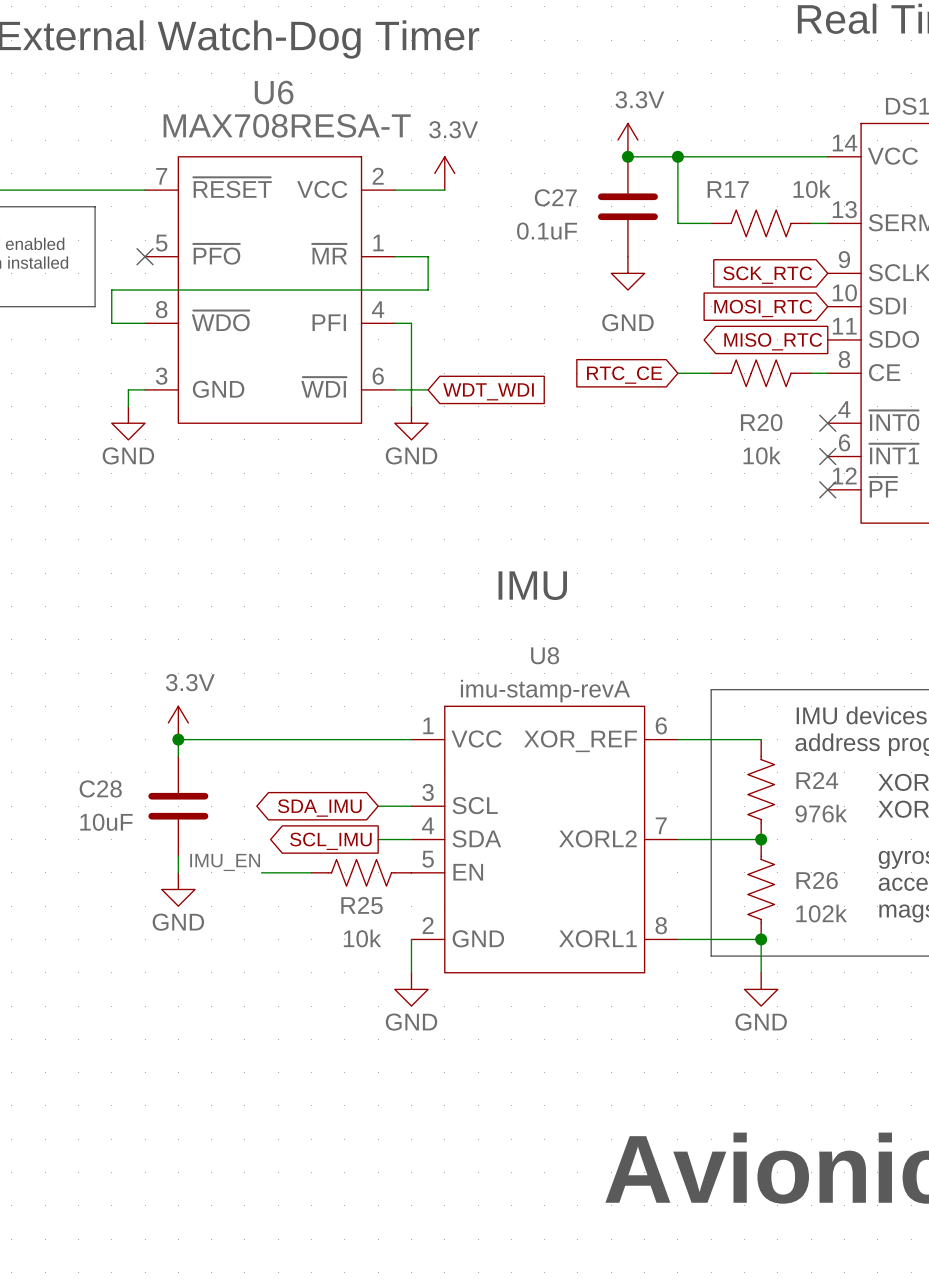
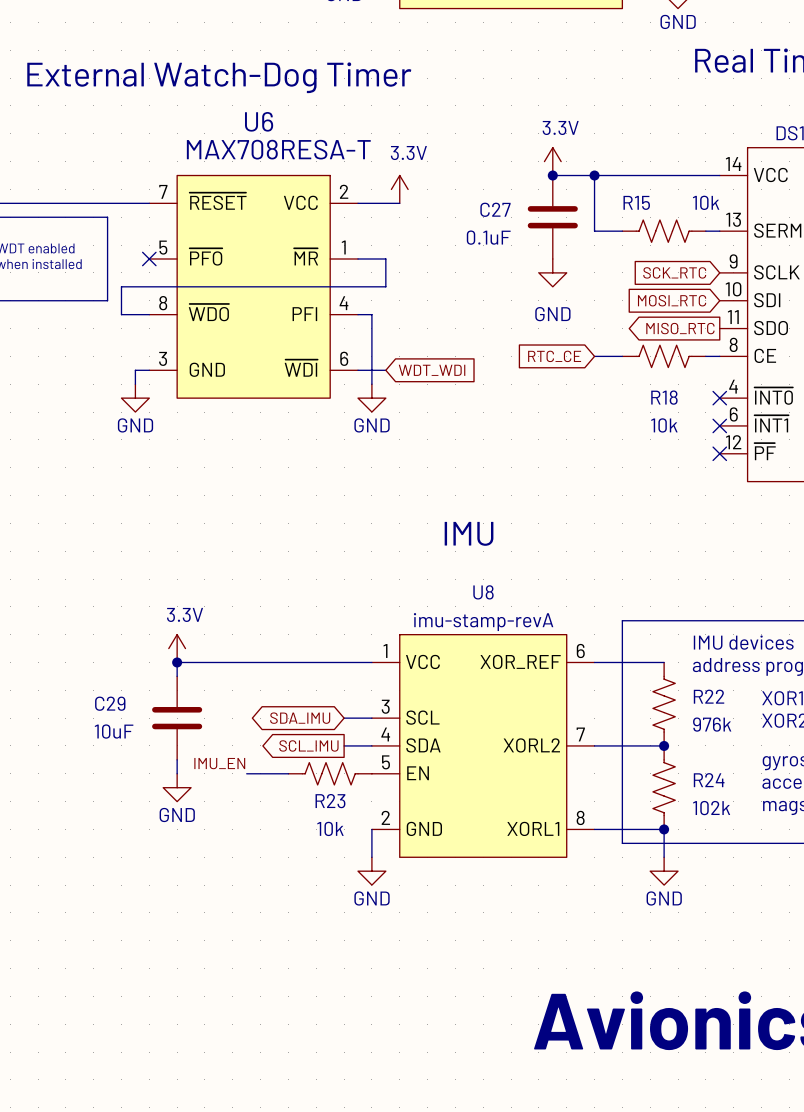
R17 name: R17 (728, 189) -> R15 (636, 202)
R20 name: R20 (761, 422) -> R18 (664, 397)
R24 name: R24 (817, 780) -> R22 (709, 696)
C28 name: C28 (100, 788) -> C29 (110, 703)
R26 name: R26 (817, 880) -> R24 (709, 780)
R25 name: R25 (362, 905) -> R23 (330, 801)

